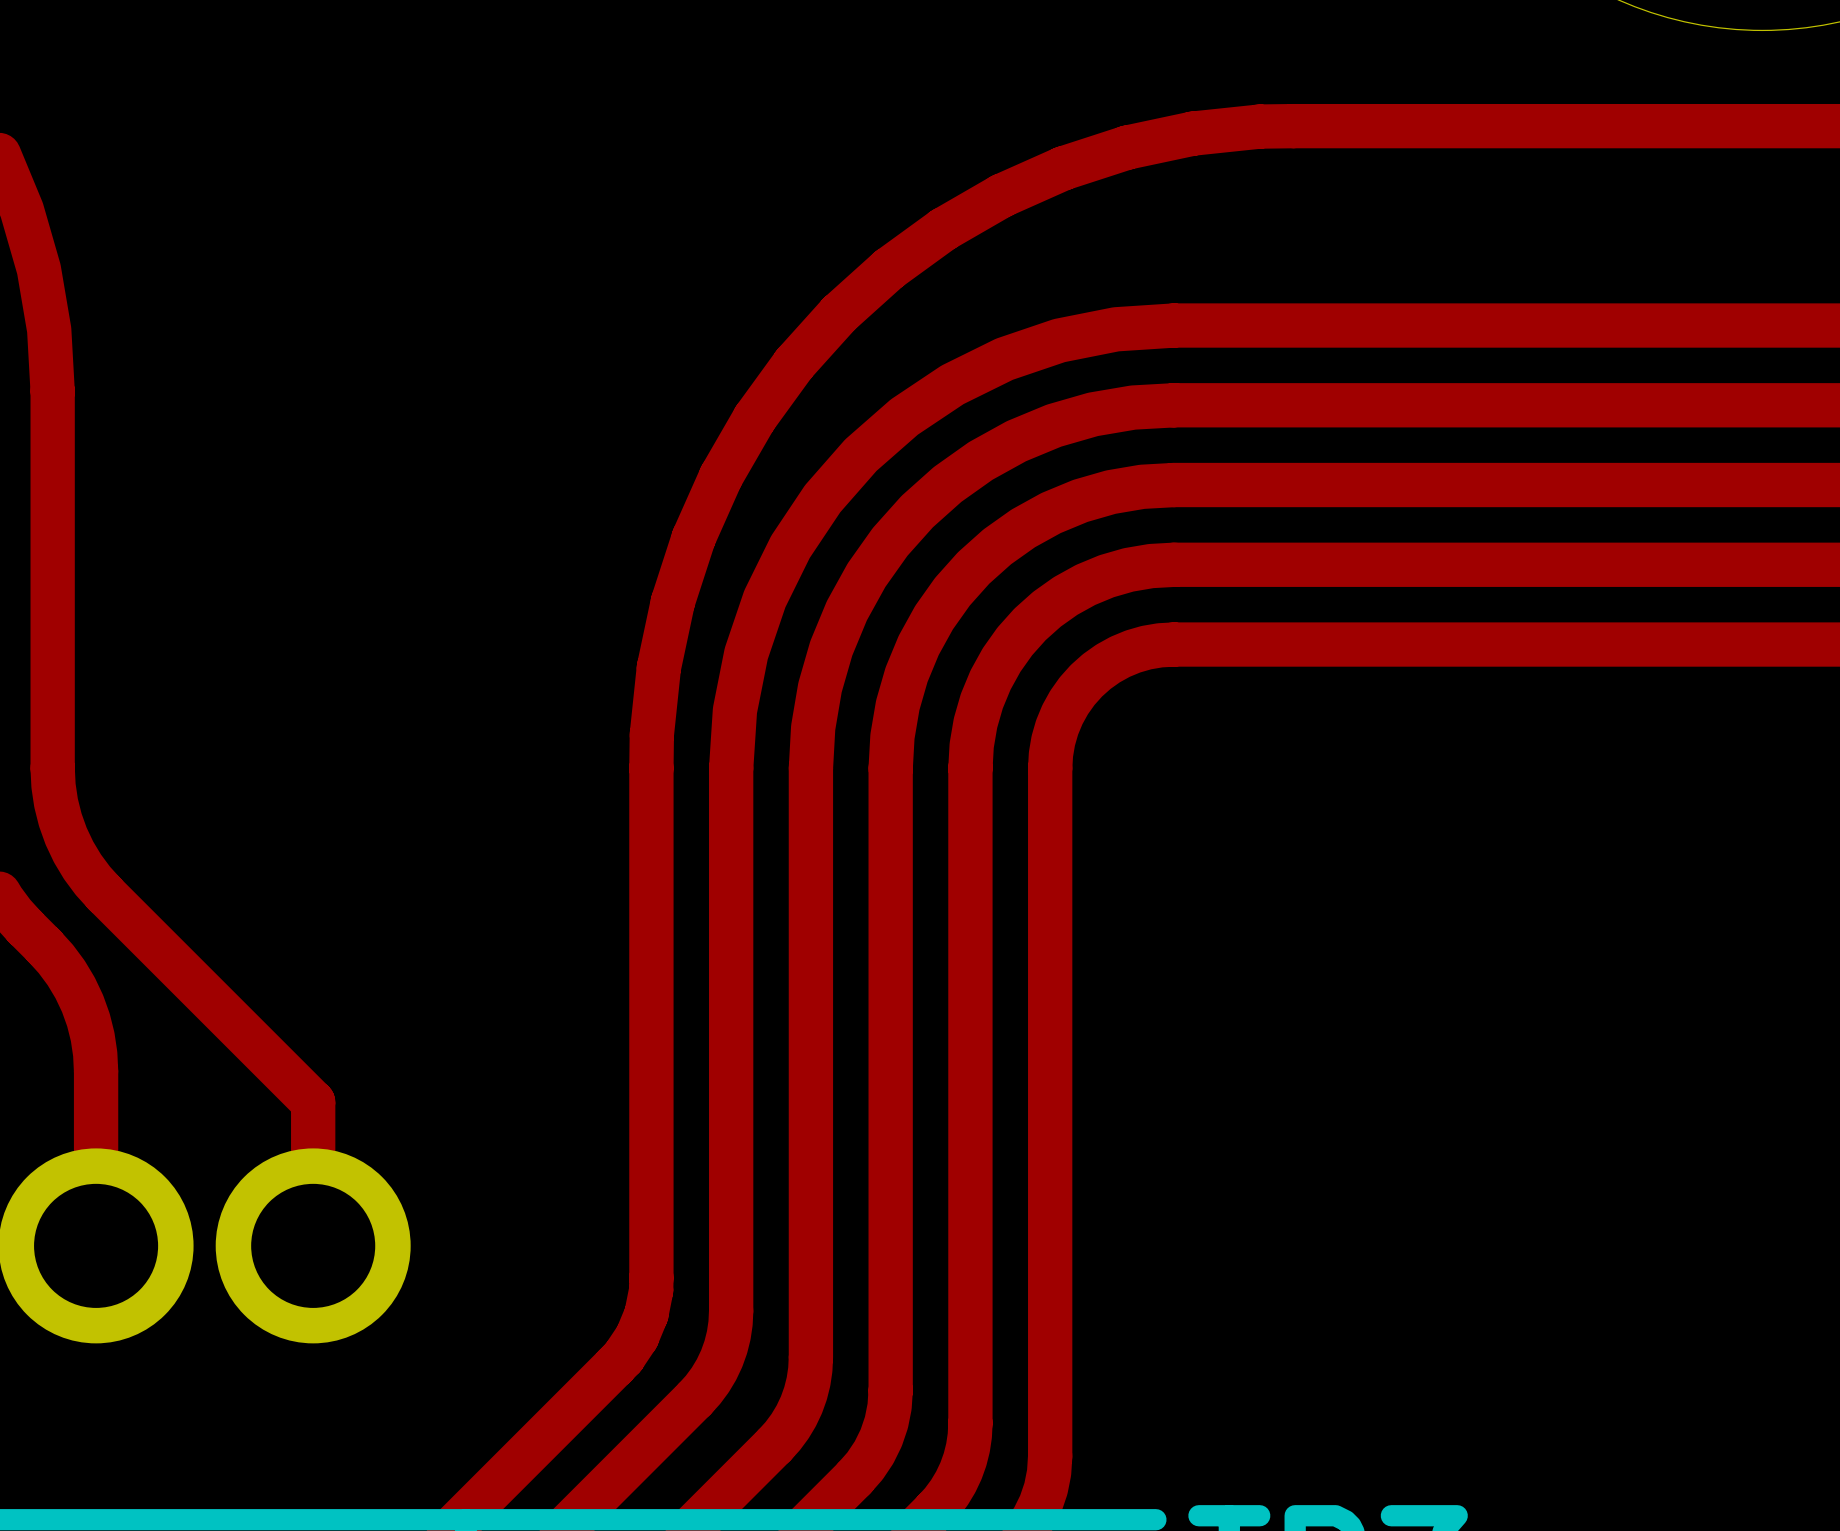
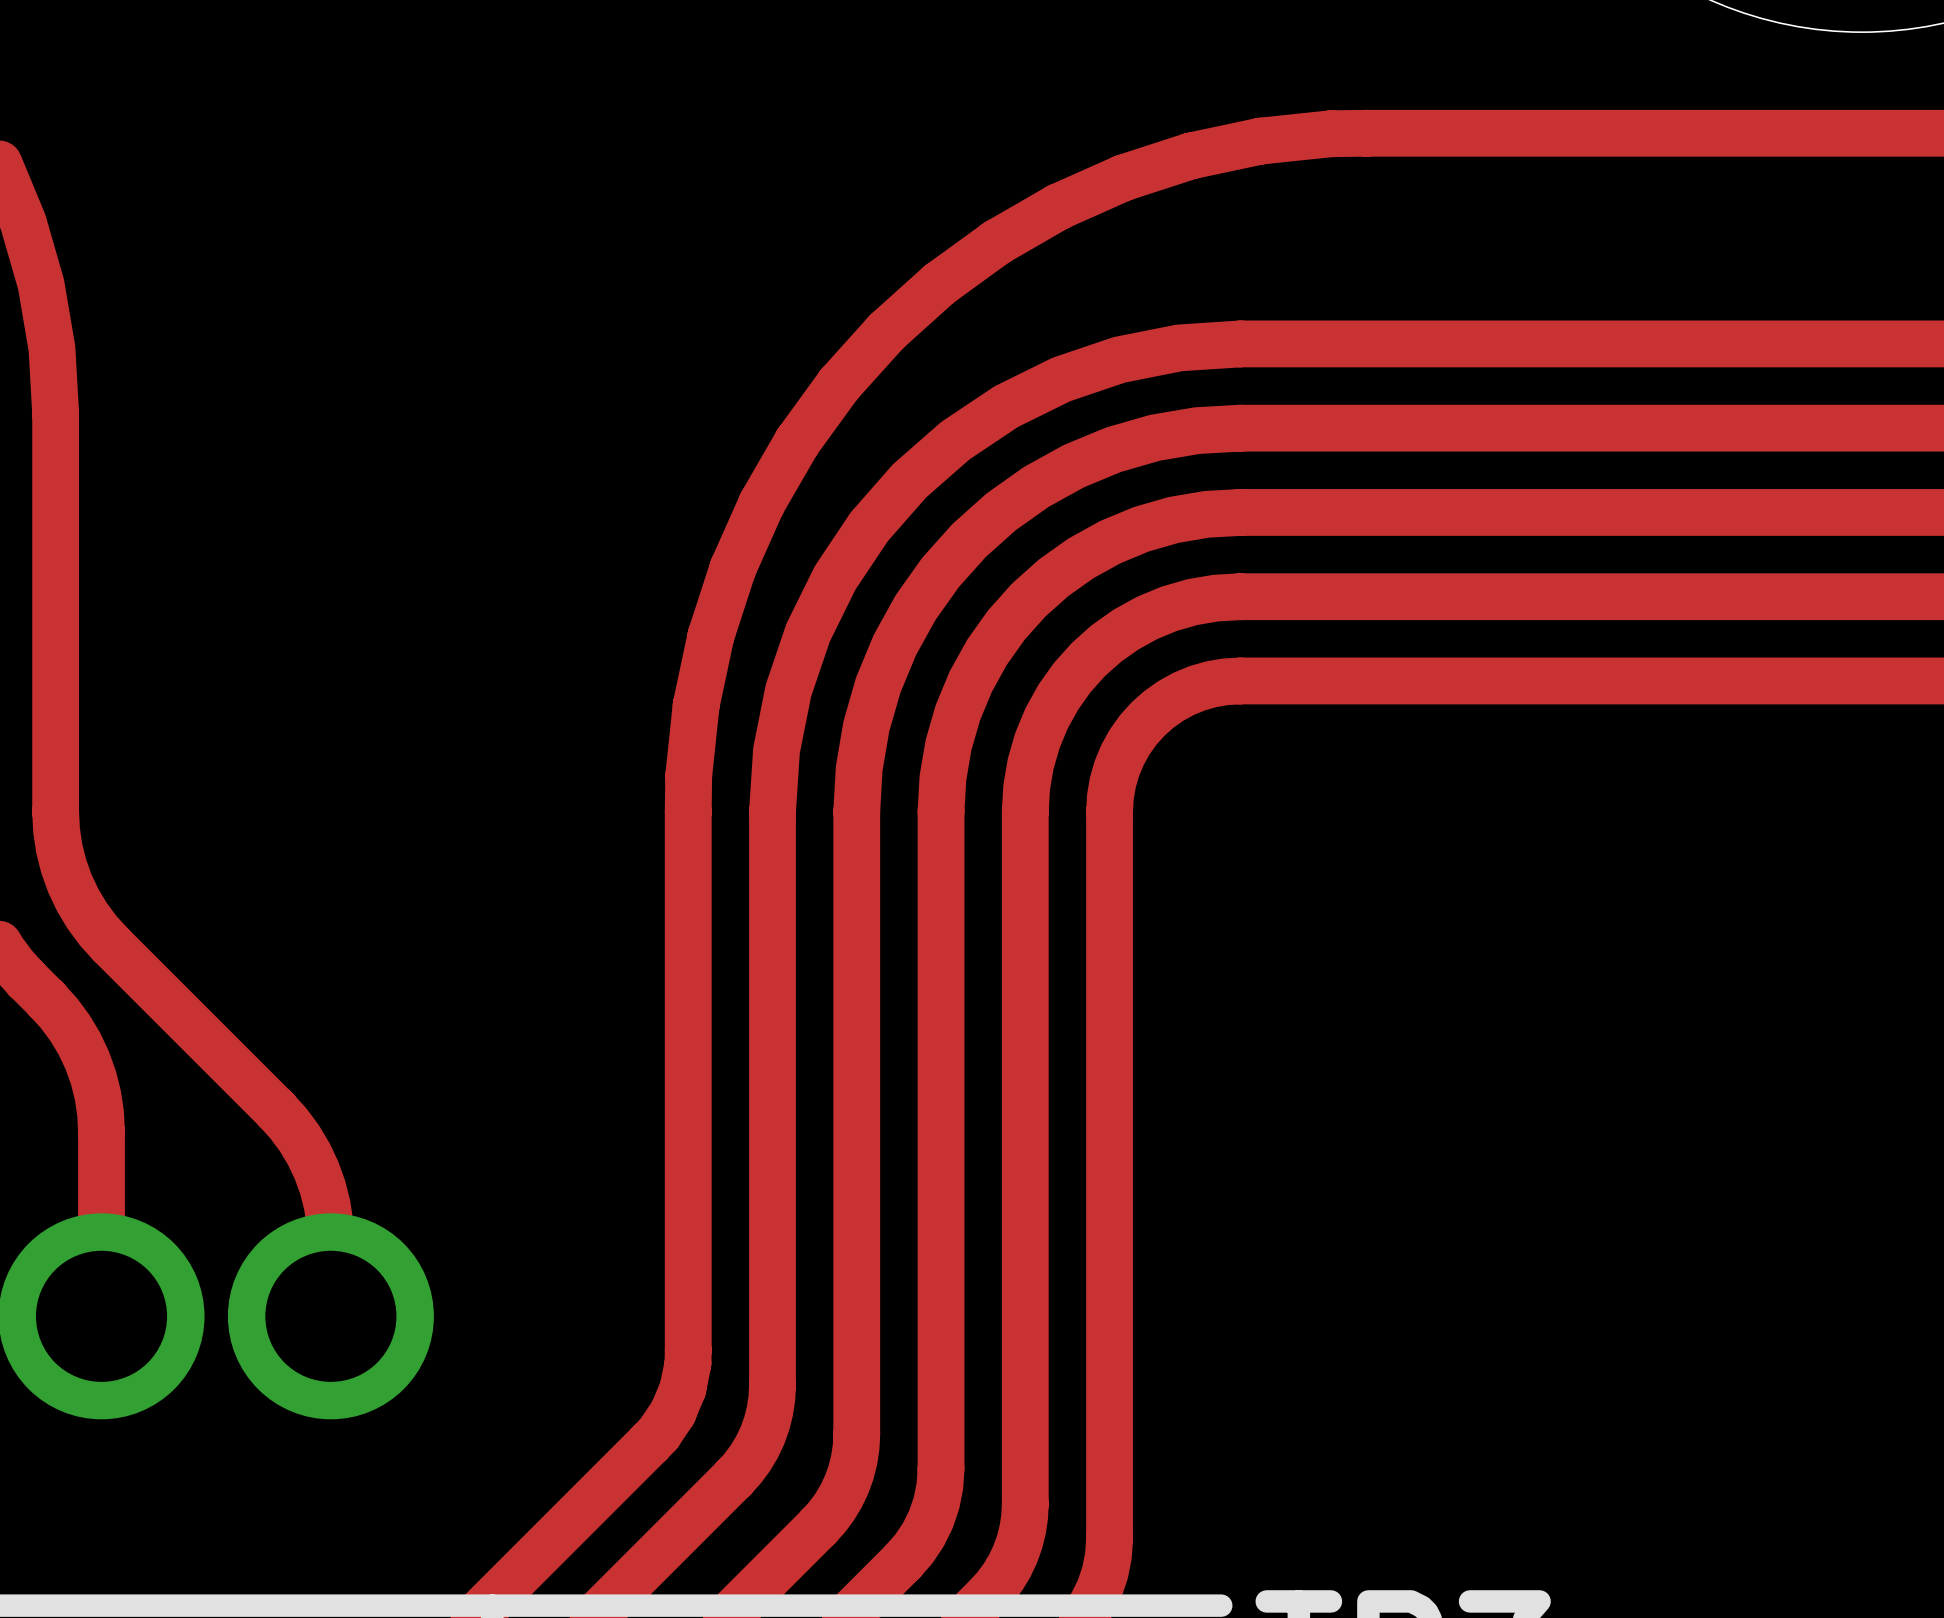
track: (261, 1050) (313, 1102) (313, 1175) -> (276, 1109) (299, 1138) (316, 1170) (327, 1205) (330, 1242)

